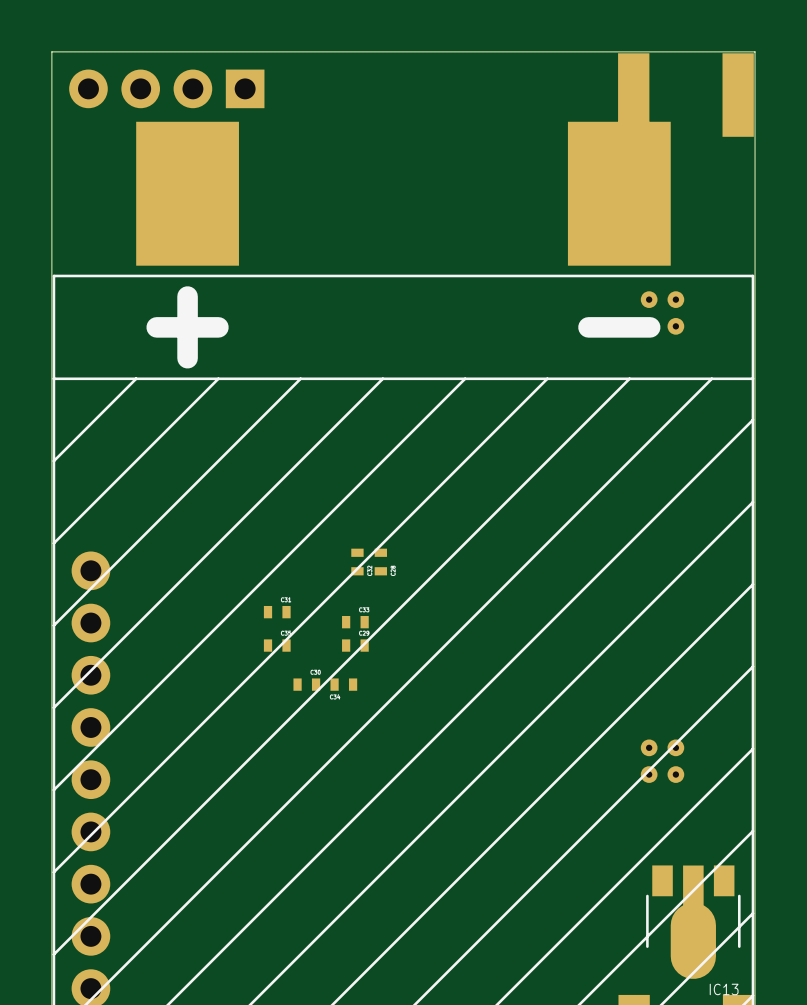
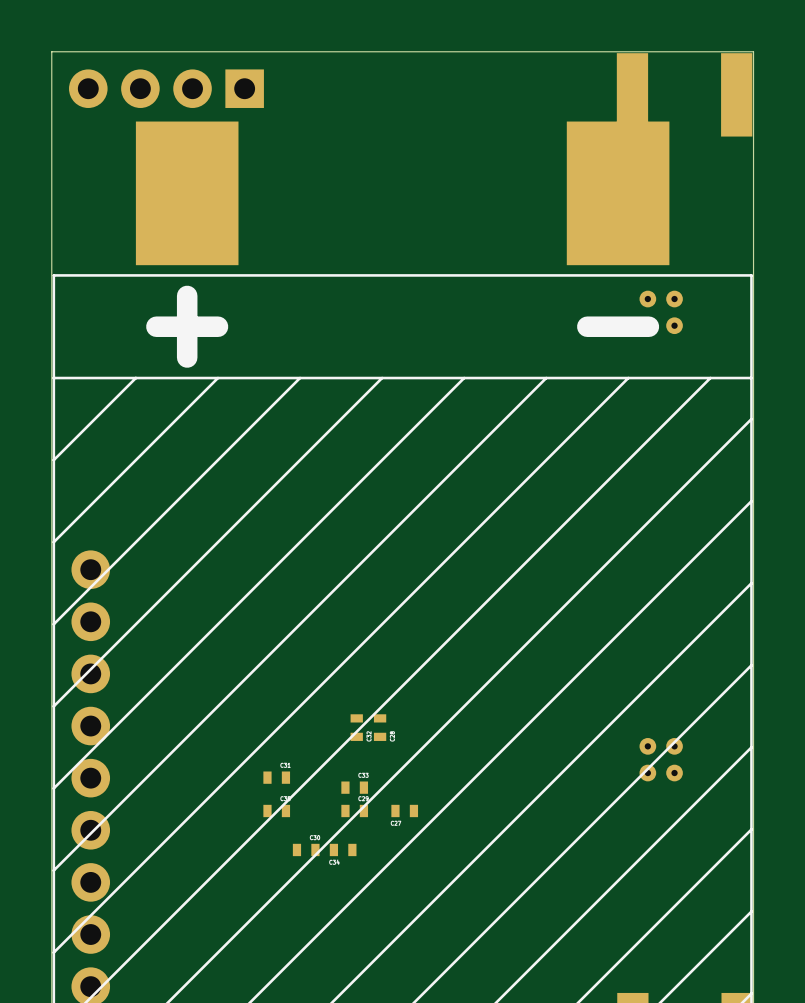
part position: (357, 562) -> (356, 727)
part position: (380, 562) -> (380, 727)
part position: (277, 612) -> (276, 777)
part position: (355, 622) -> (354, 787)
part position: (277, 645) -> (276, 810)
part position: (355, 645) -> (354, 810)
part position: (306, 684) -> (306, 849)
part position: (343, 684) -> (343, 849)
part: none -> (404, 810)
IC13: (693, 922) -> none

